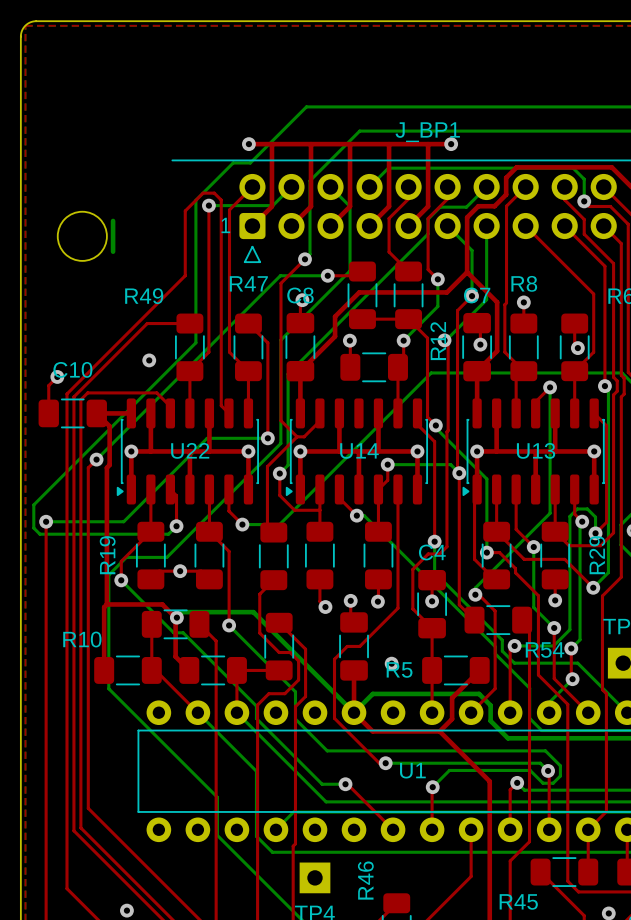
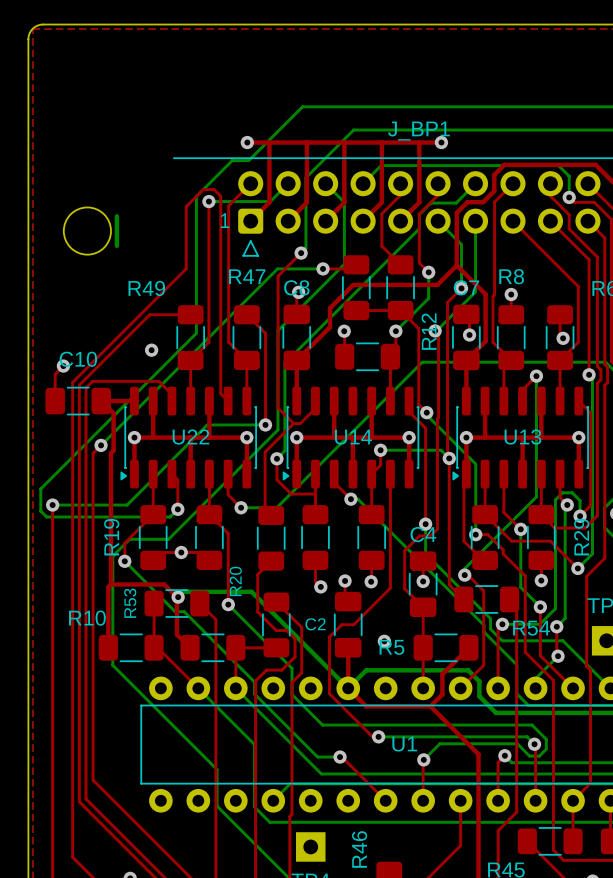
R20 name: none -> R20 (235, 581)
R53 name: none -> R53 (130, 603)
C2 name: none -> C2 (315, 624)

